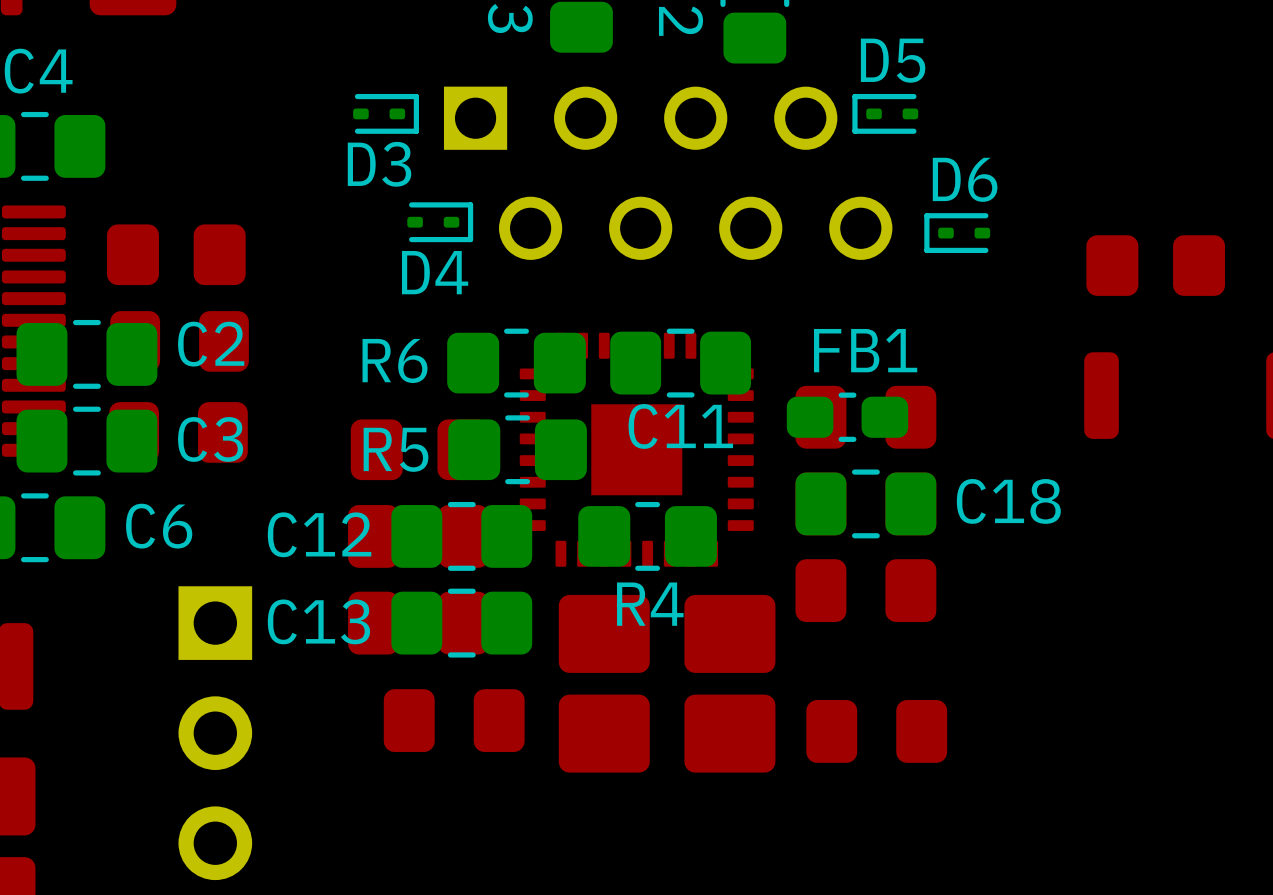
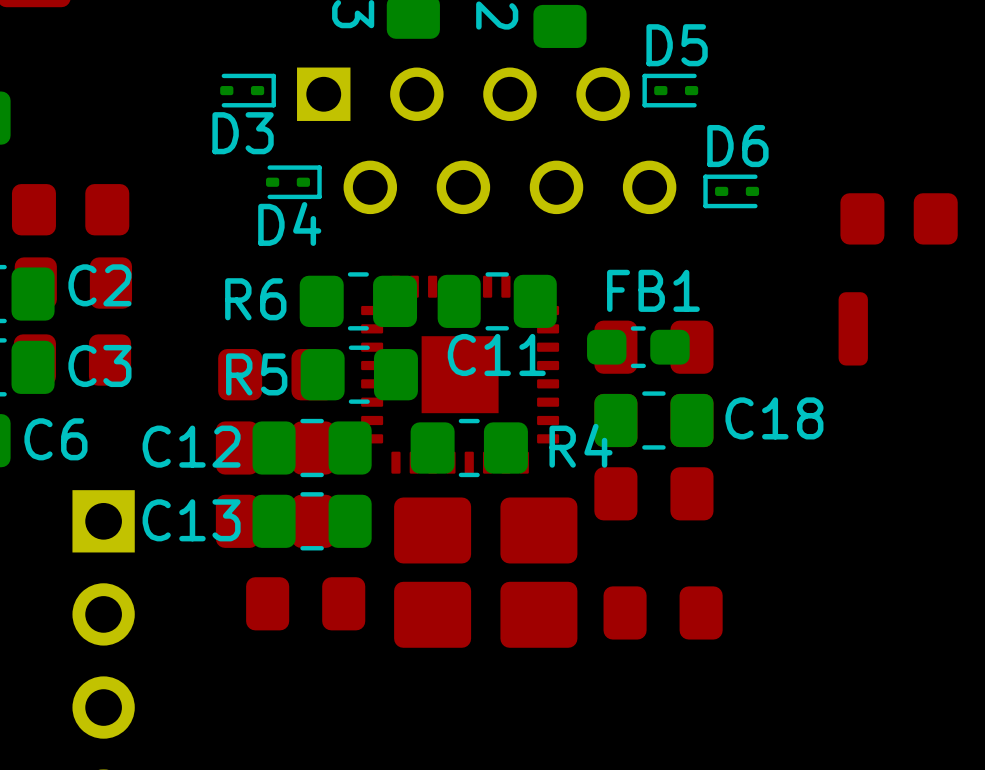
R4 name position: R4 (650, 604) -> R4 (580, 445)

